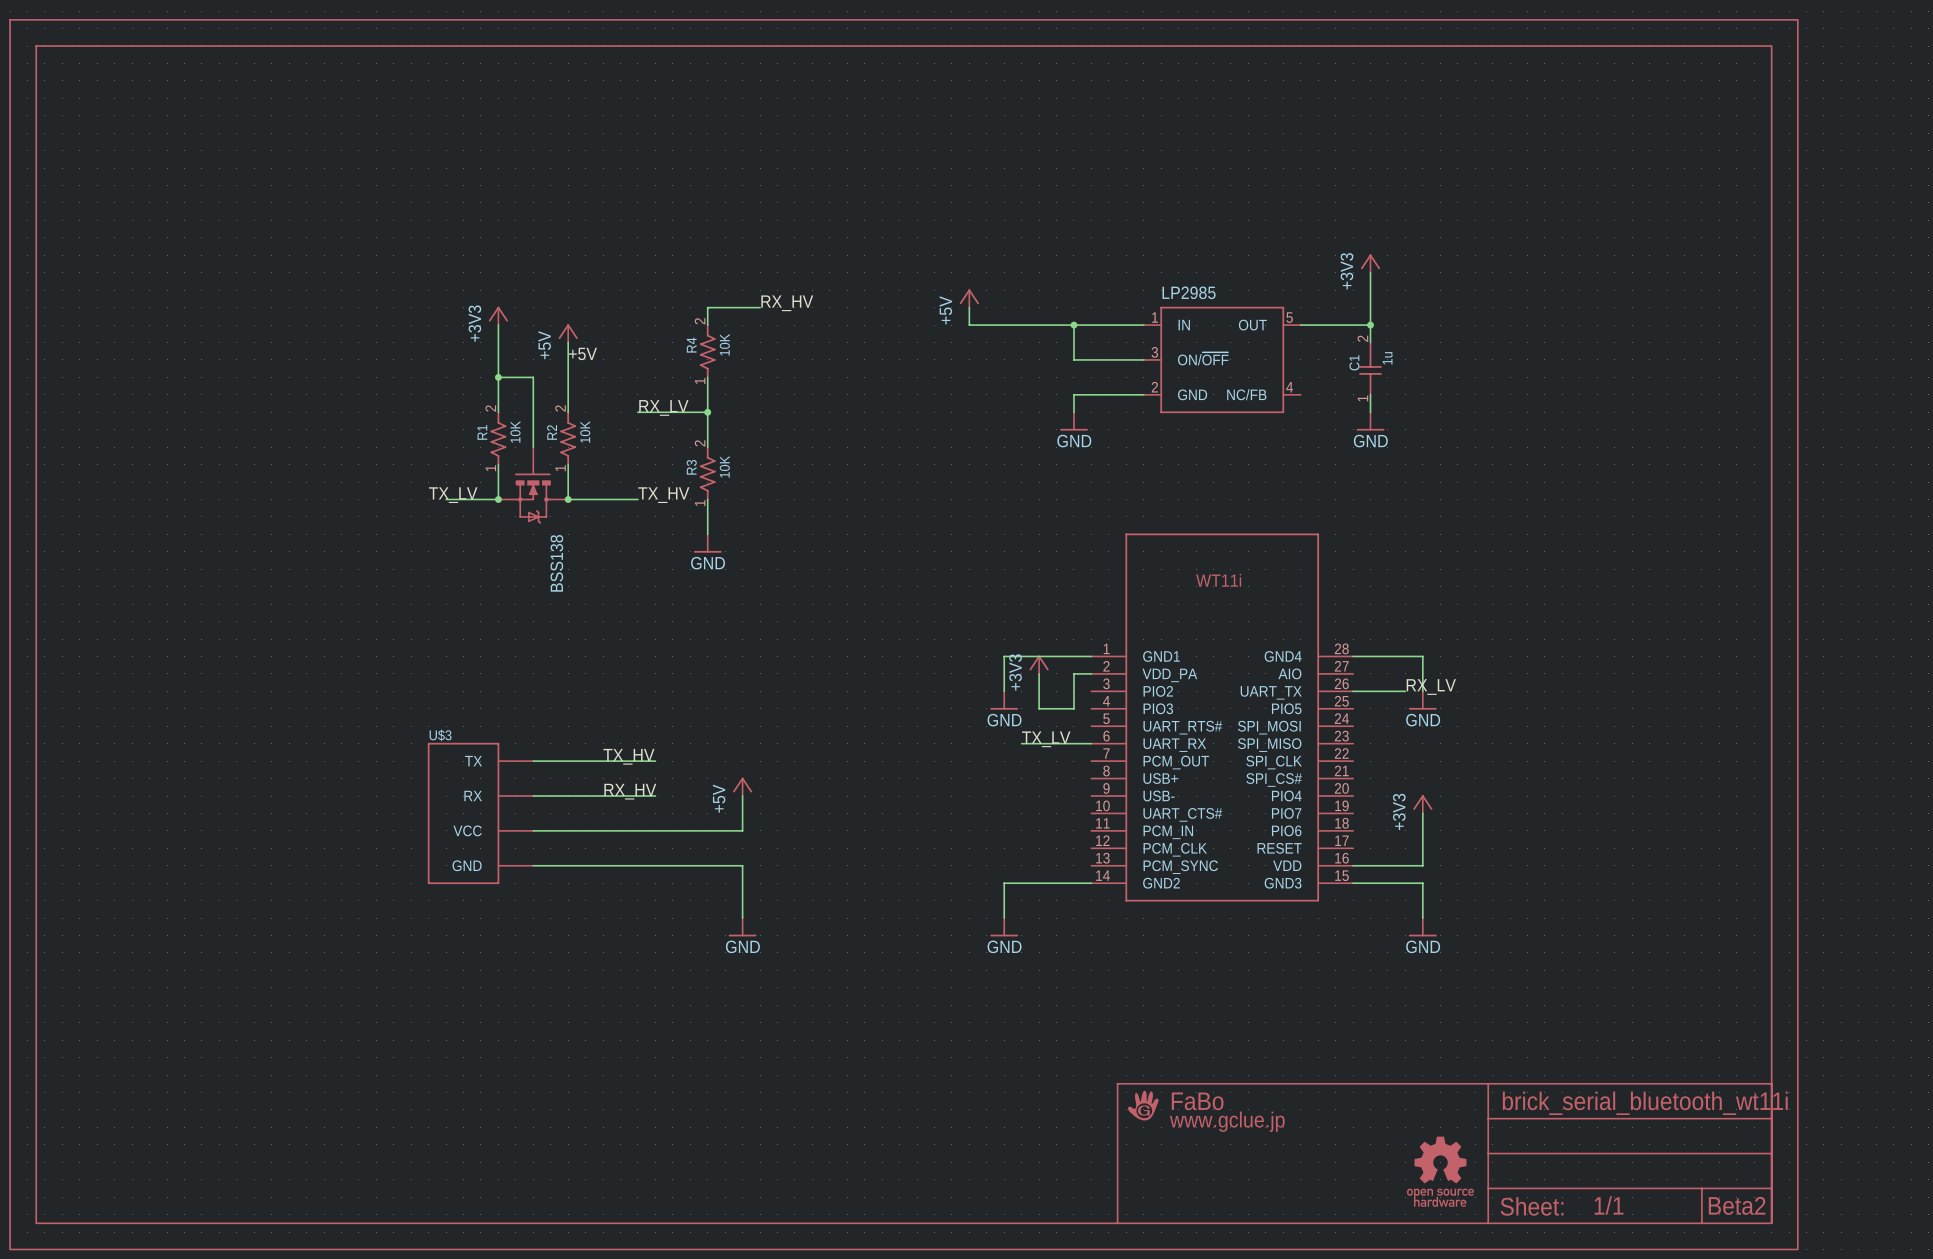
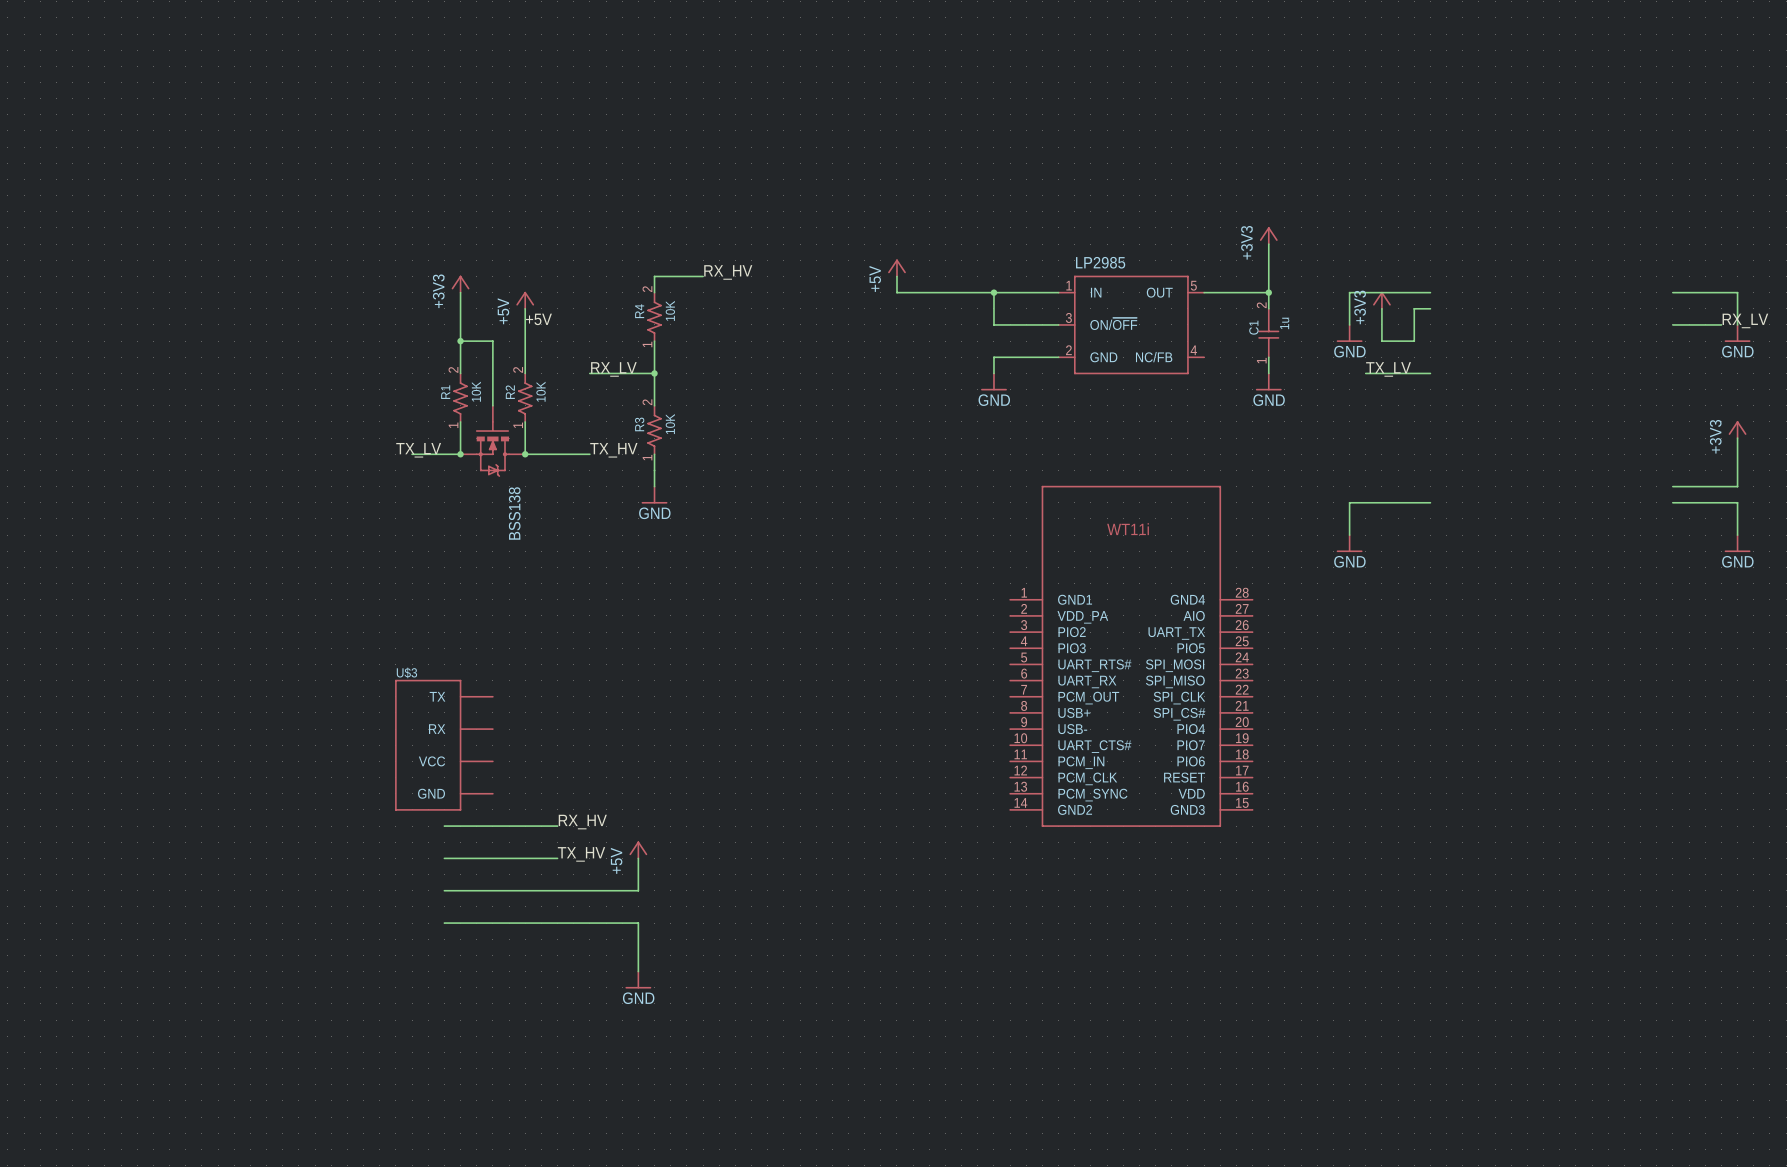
wire: none -> (1430, 292) (1349, 292) (1349, 324)
wire: none -> (1672, 292) (1737, 292) (1737, 324)
power symbol: none -> +3V3 (1381, 300)
wire: none -> (1381, 308) (1381, 341) (1414, 341) (1414, 308) (1430, 308)
label: none -> RX_LV (1745, 320)
wire: none -> (1672, 324) (1721, 324)
power symbol: none -> GND (1349, 333)
power symbol: none -> GND (1737, 333)
label: none -> TX_LV (1388, 369)
wire: none -> (1365, 373) (1430, 373)
power symbol: none -> +3V3 (1737, 429)
wire: none -> (1737, 438) (1737, 486) (1672, 486)
wire: none -> (1430, 502) (1349, 502) (1349, 535)
wire: none -> (1672, 502) (1737, 502) (1737, 535)
power symbol: none -> GND (1737, 543)
part: (903, 634) -> none
wire: (1091, 656) (1004, 656) (1004, 691) -> none
wire: (1353, 656) (1422, 656) (1422, 691) -> none
power symbol: +3V3 (1039, 664) -> none
wire: (1039, 673) (1039, 708) (1073, 708) (1073, 673) (1091, 673) -> none
label: RX_LV (1431, 687) -> none
wire: (1353, 691) (1405, 691) -> none
power symbol: GND (1004, 700) -> none
power symbol position: GND (1422, 700) -> GND (1349, 543)
label: TX_LV (1046, 739) -> none
wire: (1021, 743) (1091, 743) -> none
label: TX_HV (628, 756) -> none
wire: (533, 761) (655, 761) -> (444, 826) (557, 826)
power symbol position: +5V (742, 786) -> +5V (638, 849)
label position: RX_HV (630, 791) -> RX_HV (582, 822)
wire: (533, 796) (655, 796) -> (444, 858) (557, 858)
wire: (742, 796) (742, 830) (533, 830) -> (638, 858) (638, 890) (444, 890)
power symbol: +3V3 (1422, 804) -> none
wire: (1422, 813) (1422, 865) (1353, 865) -> none
wire: (533, 865) (742, 865) (742, 918) -> (444, 923) (638, 923) (638, 971)
wire: (1091, 883) (1004, 883) (1004, 918) -> none
wire: (1353, 883) (1422, 883) (1422, 918) -> none
power symbol position: GND (742, 927) -> GND (638, 980)
power symbol: GND (1004, 927) -> none
power symbol: GND (1422, 927) -> none
label: none -> TX_HV (581, 854)
part: (1440, 1171) -> none
text: Beta2 (1737, 1205) -> none

